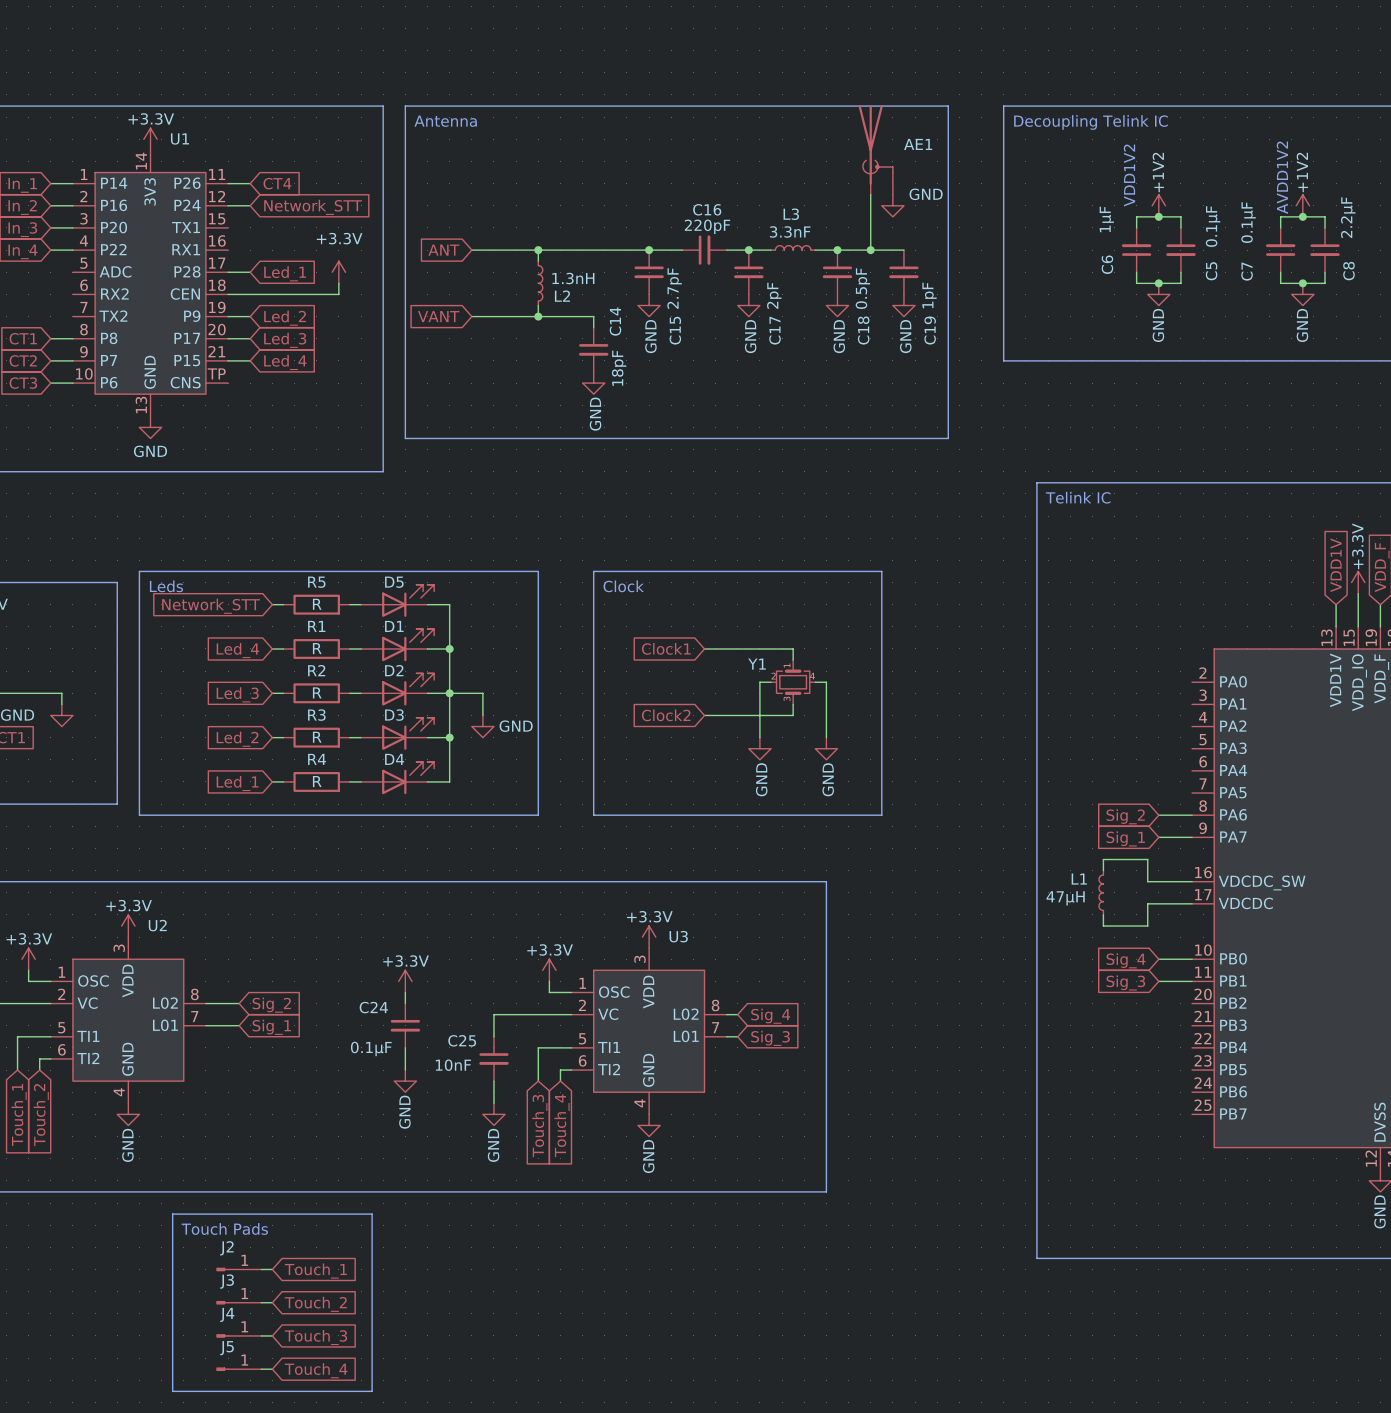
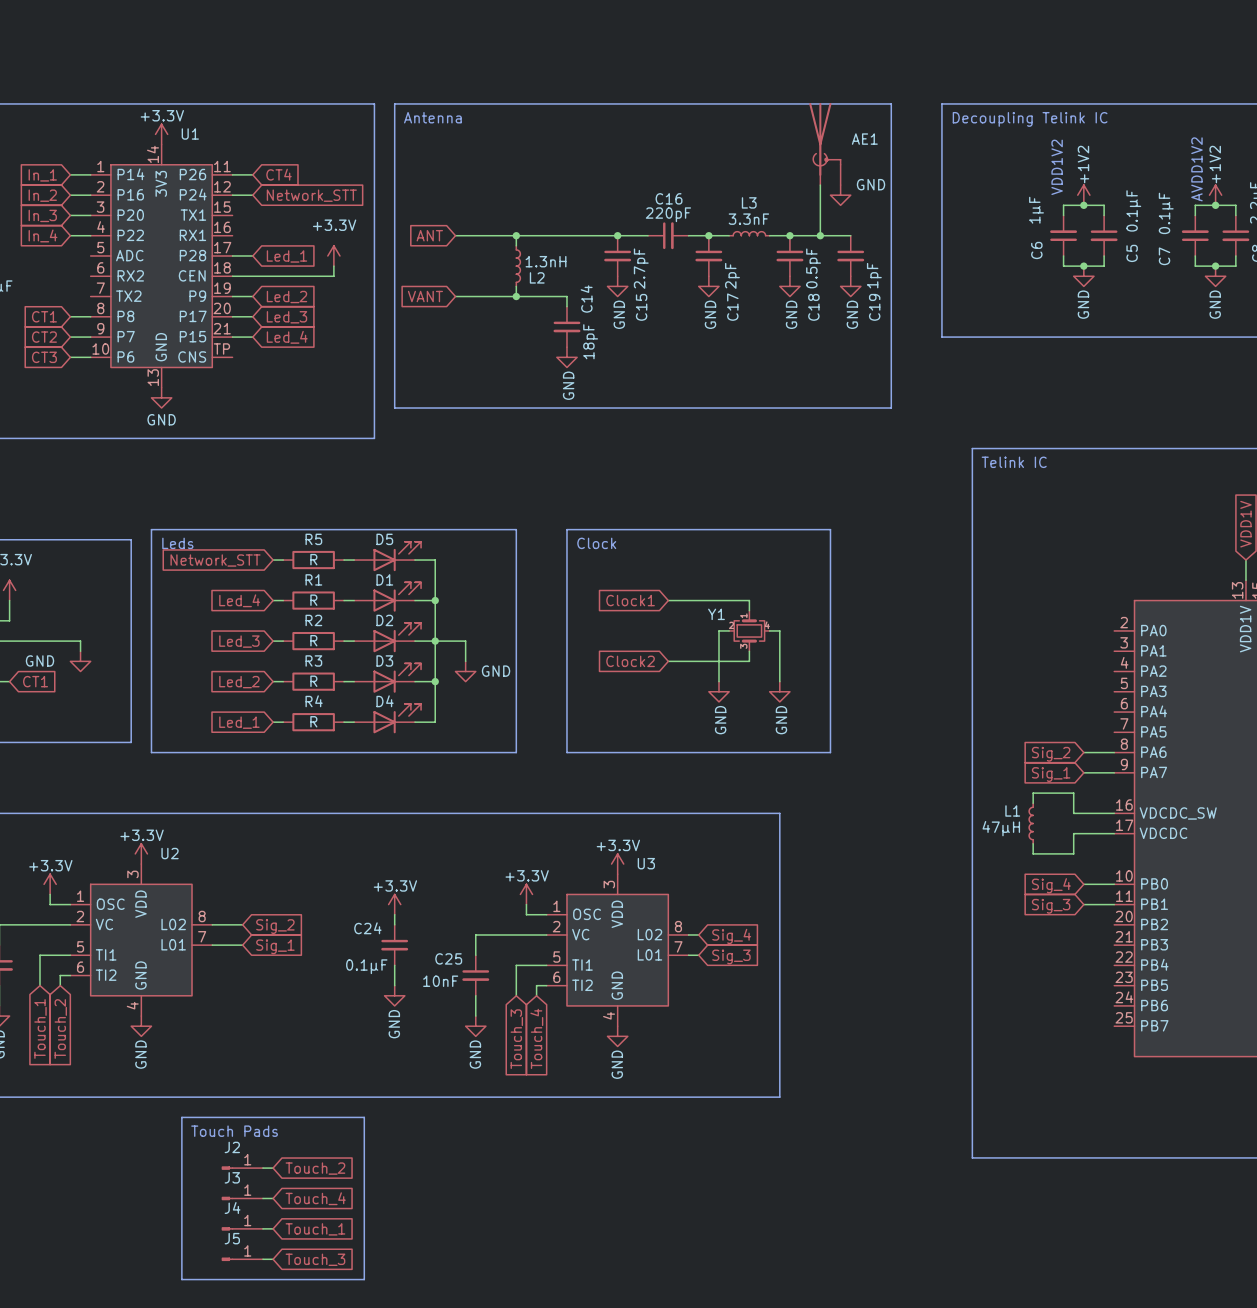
global label: Touch_1 (315, 1271) -> Touch_2 (315, 1168)
global label: Touch_2 (315, 1304) -> Touch_4 (315, 1198)
global label: Touch_3 (315, 1337) -> Touch_1 (315, 1229)
global label: Touch_4 (316, 1370) -> Touch_3 (315, 1259)

